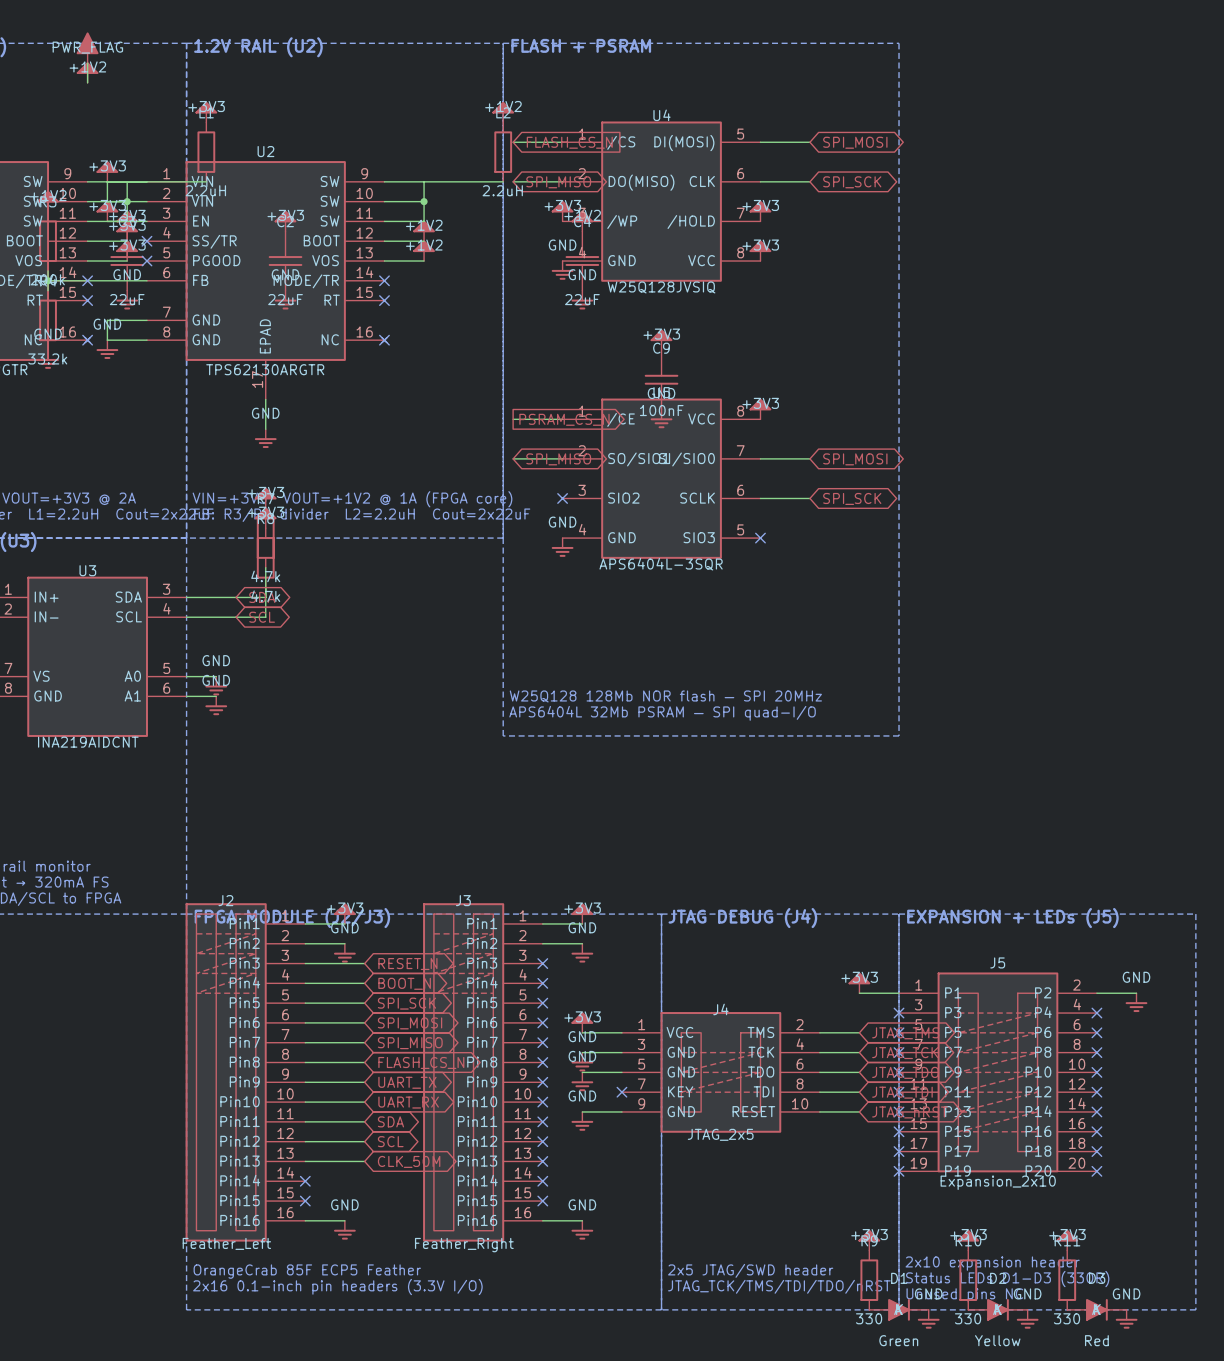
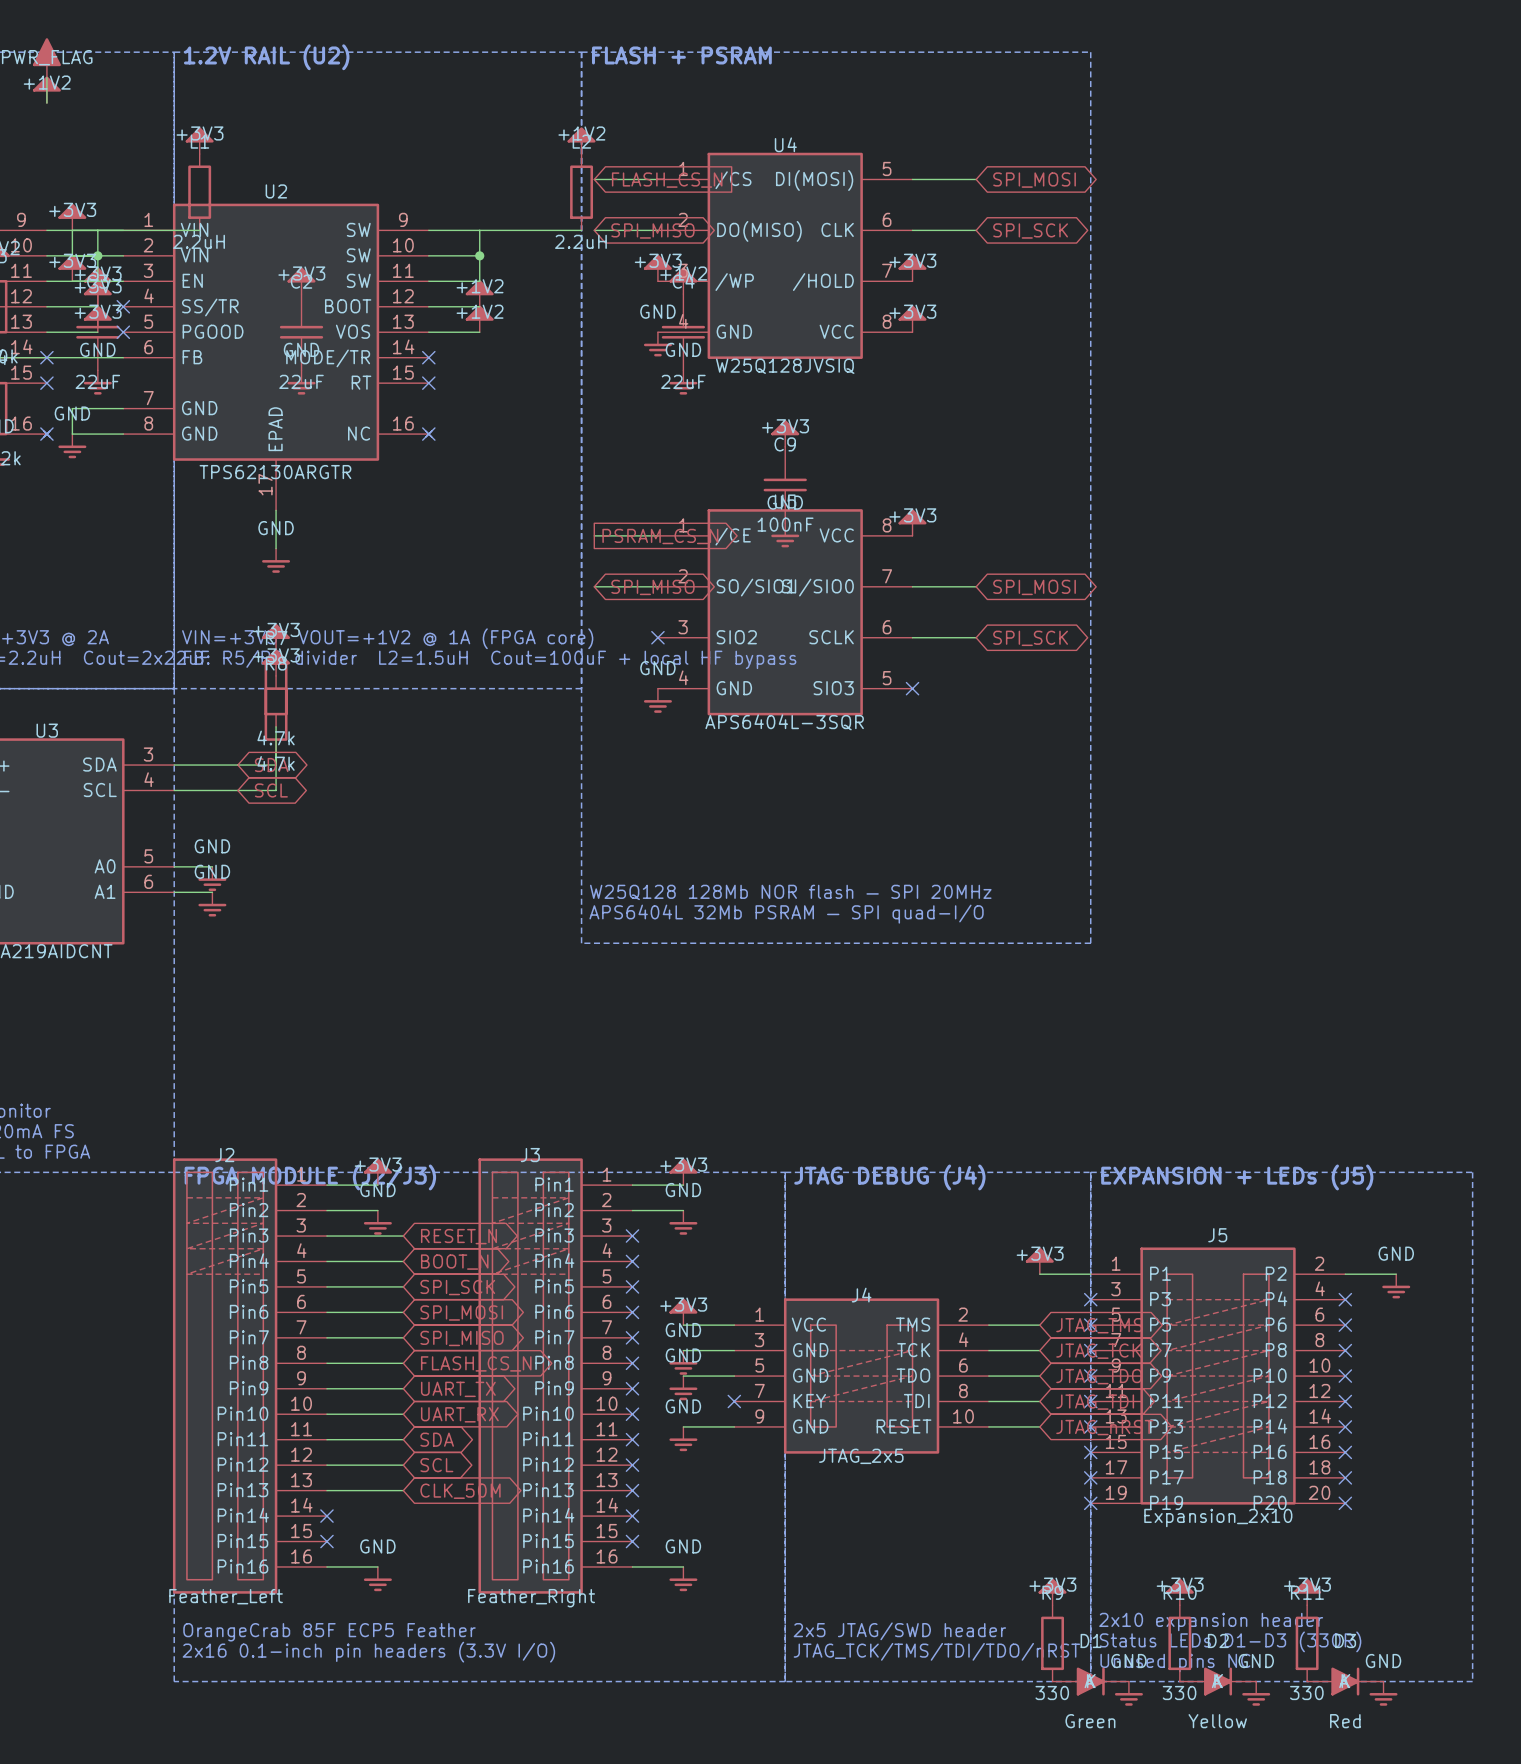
text: FB: R3/R4 divider L2=2.2uH Cout=2x22uF (362, 514) -> FB: R5/R6 divider L2=1.5uH Cout=100uF + local HF bypass (490, 659)

